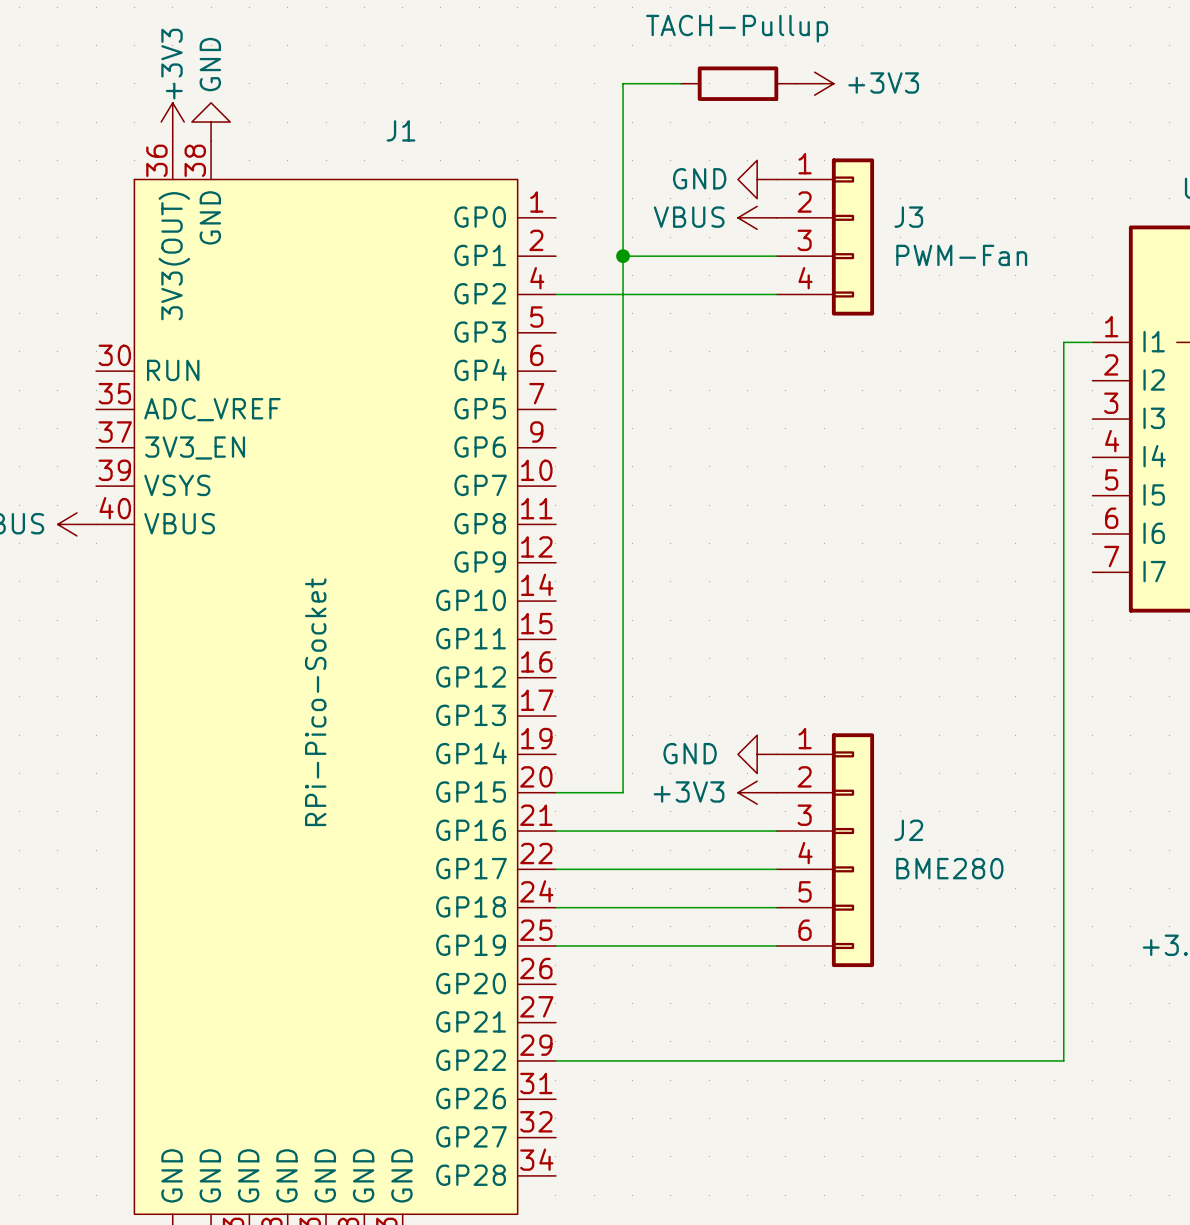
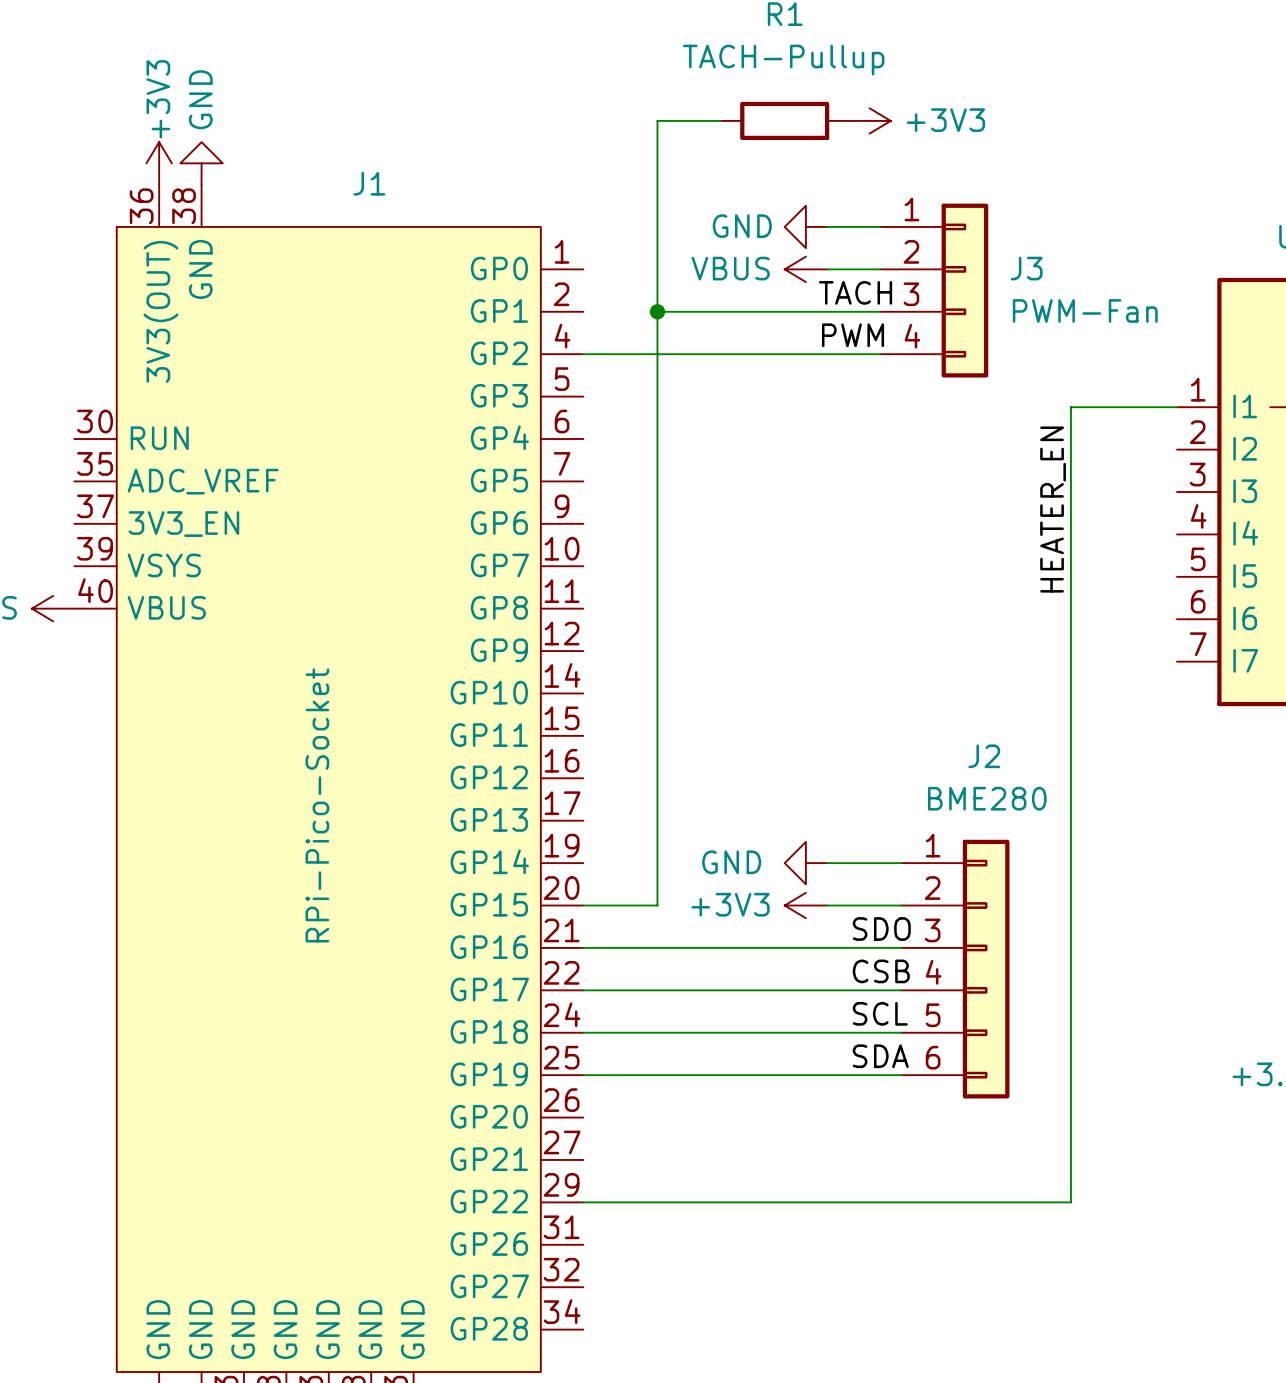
J1 name position: J1 (400, 130) -> J1 (369, 183)
J3 position: (825, 237) -> (934, 290)
label: none -> TACH (855, 292)
label: none -> PWM (853, 335)
wire: (1063, 342) (1063, 1060) (996, 1060) -> (1145, 407) (1070, 407) (1070, 1202)
label: none -> HEATER_EN (1053, 509)
label: none -> SDO (881, 929)
J2 name position: J2 (908, 830) -> J2 (984, 756)
J2 position: (825, 850) -> (955, 969)
label: none -> CSB (881, 971)
J2 value position: BME280 (949, 868) -> BME280 (987, 798)
label: none -> SCL (880, 1013)
label: none -> SDA (880, 1056)

